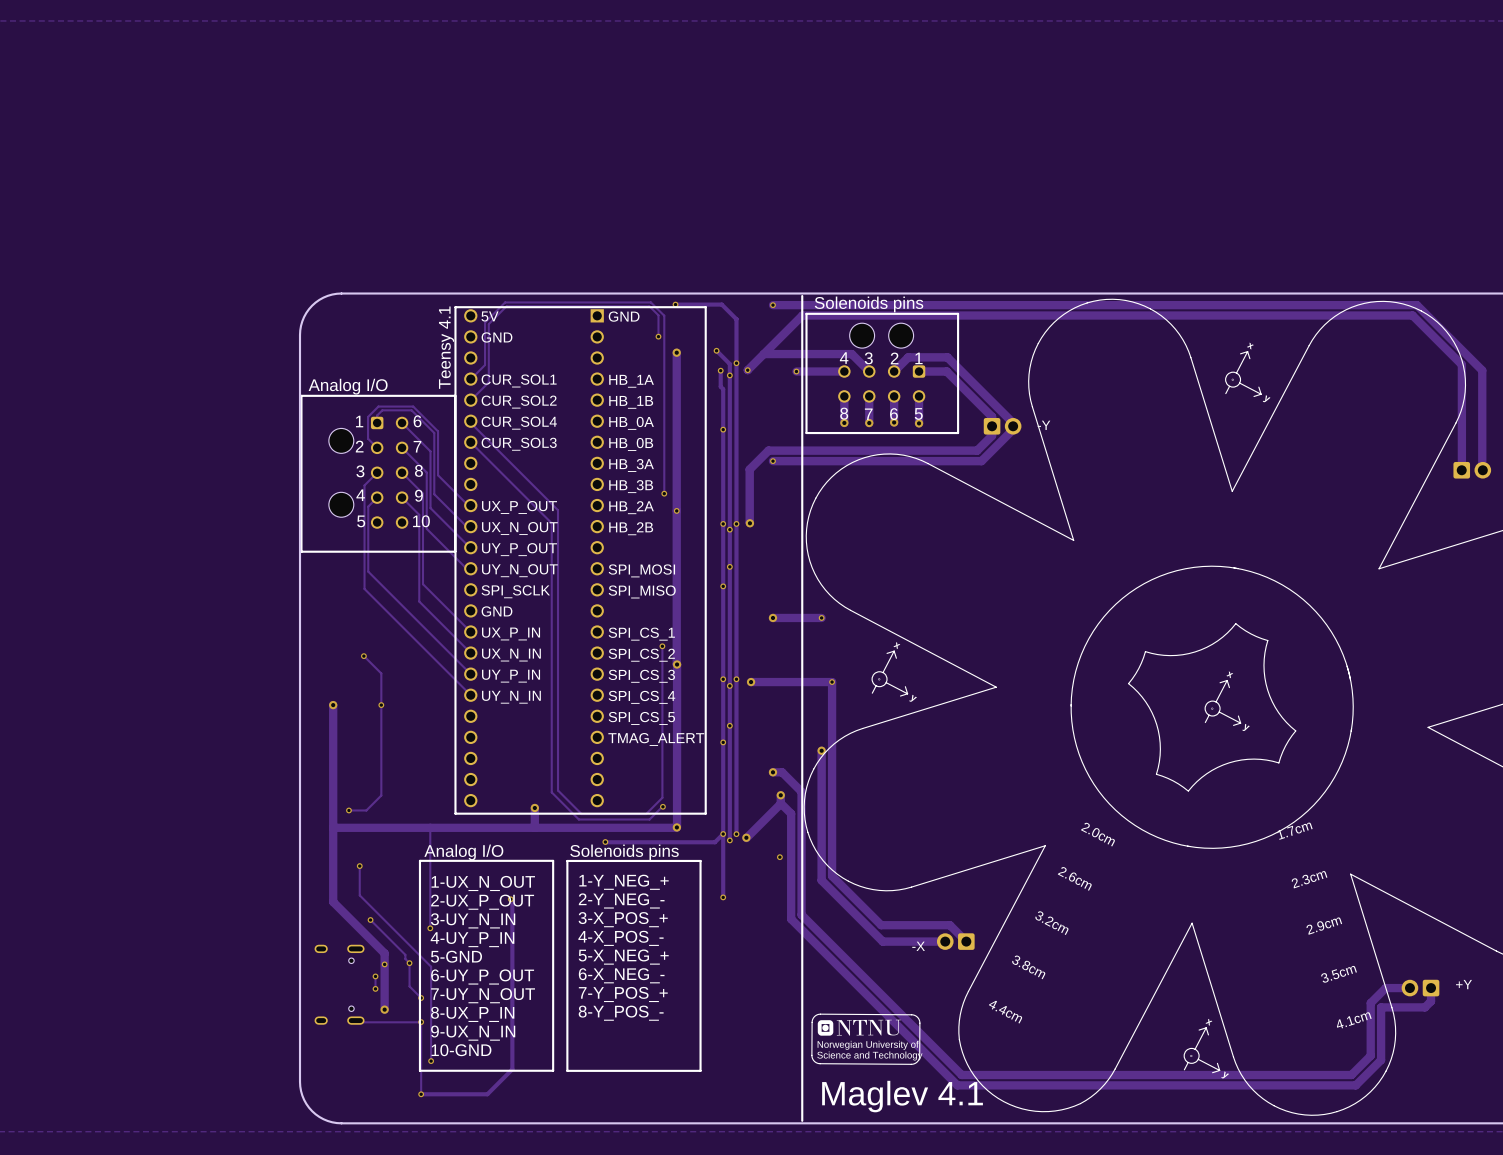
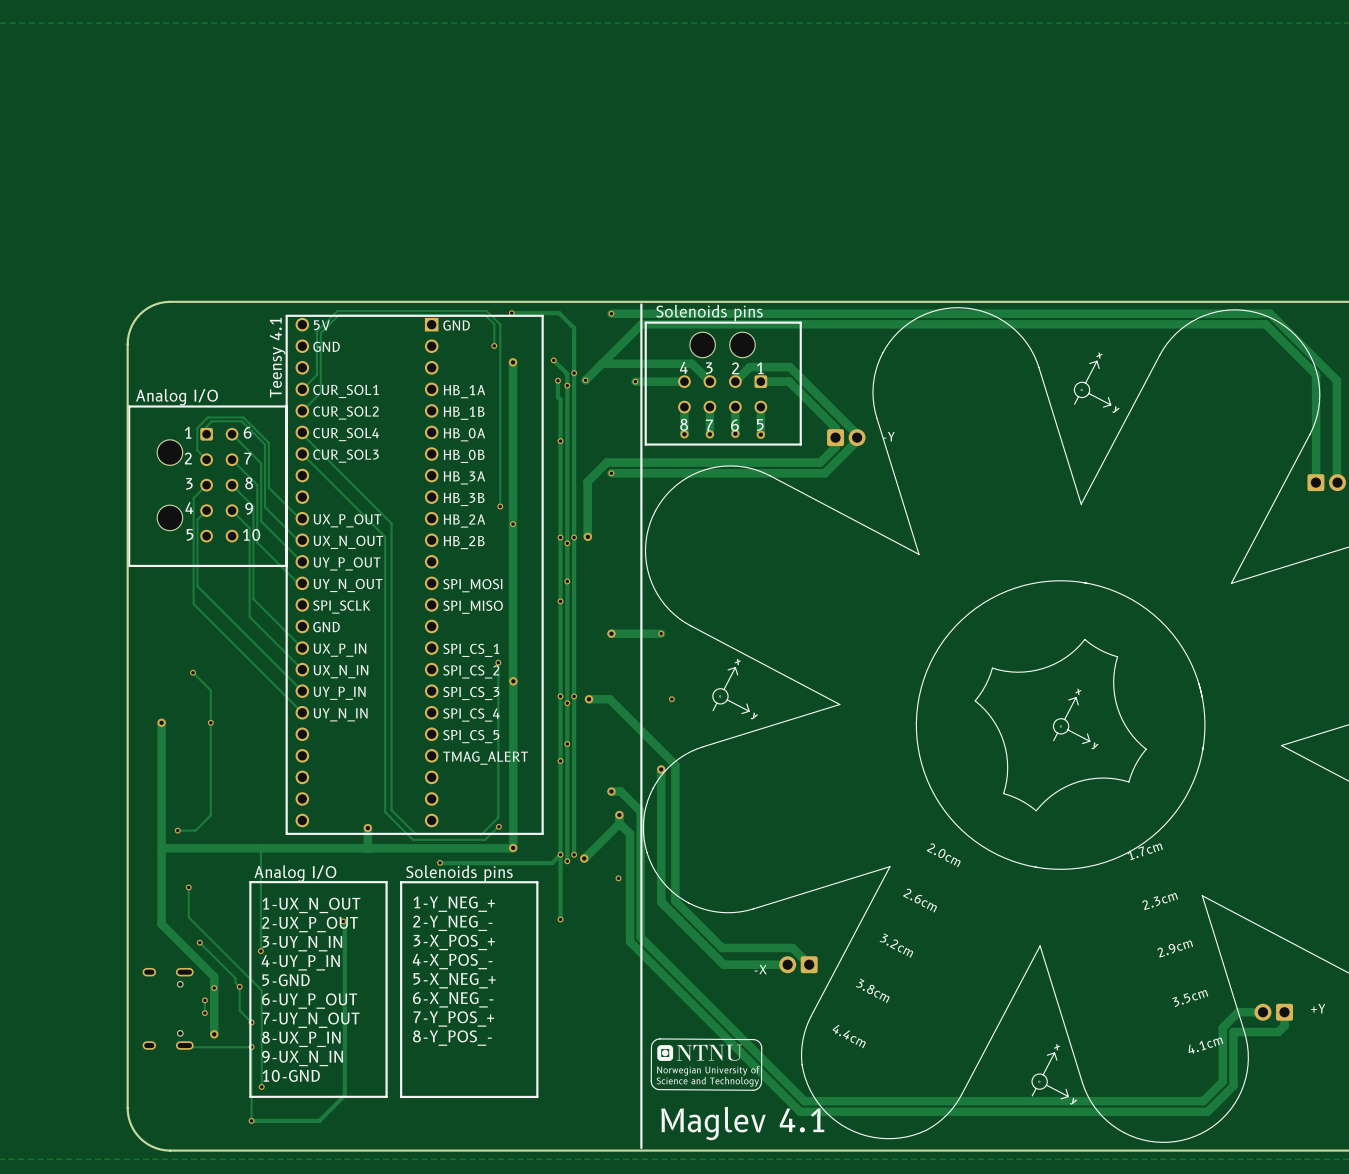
track: (771, 682) (832, 682) (832, 876) (835, 879) -> (609, 699) (675, 764) (675, 901)

